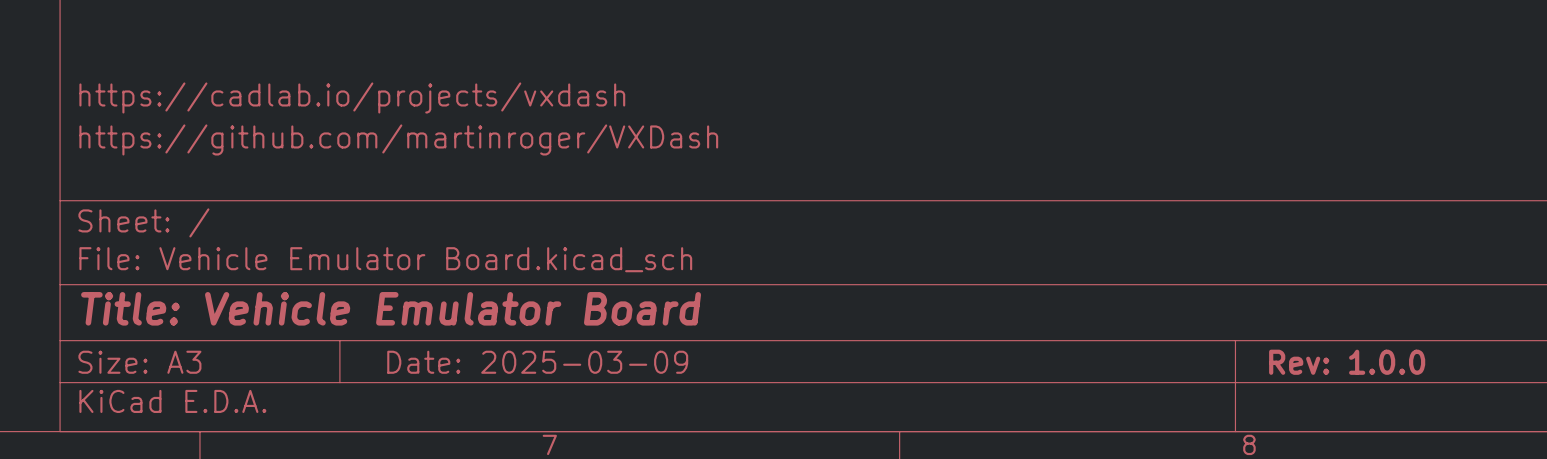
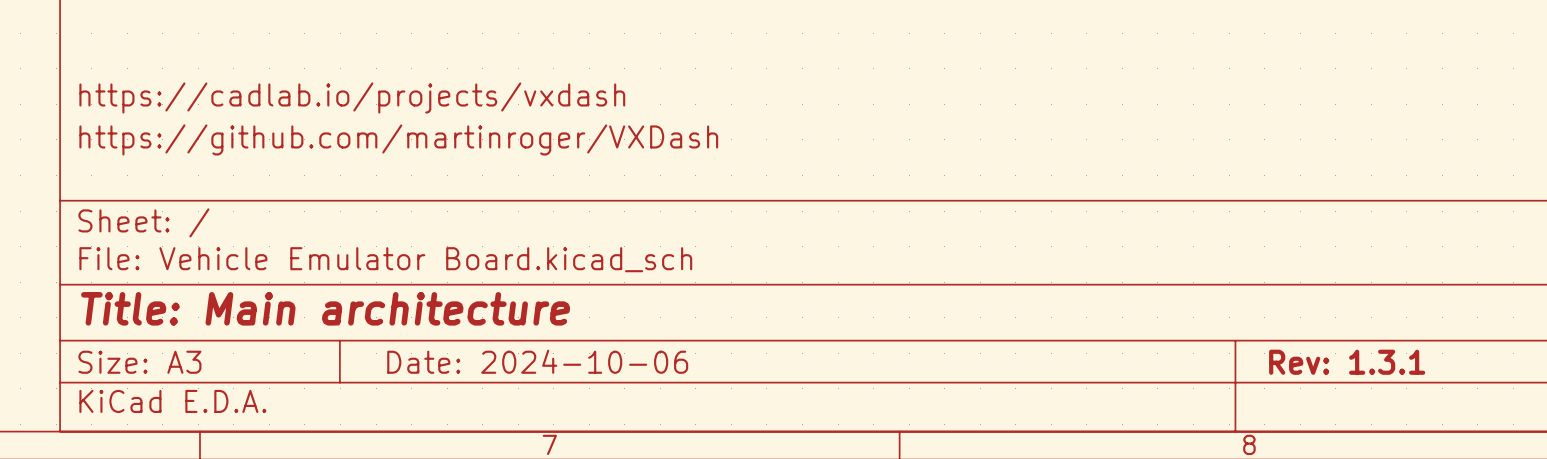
title block: Title: Vehicle Emulator Board (391, 308) -> Title: Main architecture (325, 308)
title block: Date: 2025-03-09 (537, 362) -> Date: 2024-10-06 (537, 361)
title block: Rev: 1.0.0 (1347, 362) -> Rev: 1.3.1 (1347, 362)

